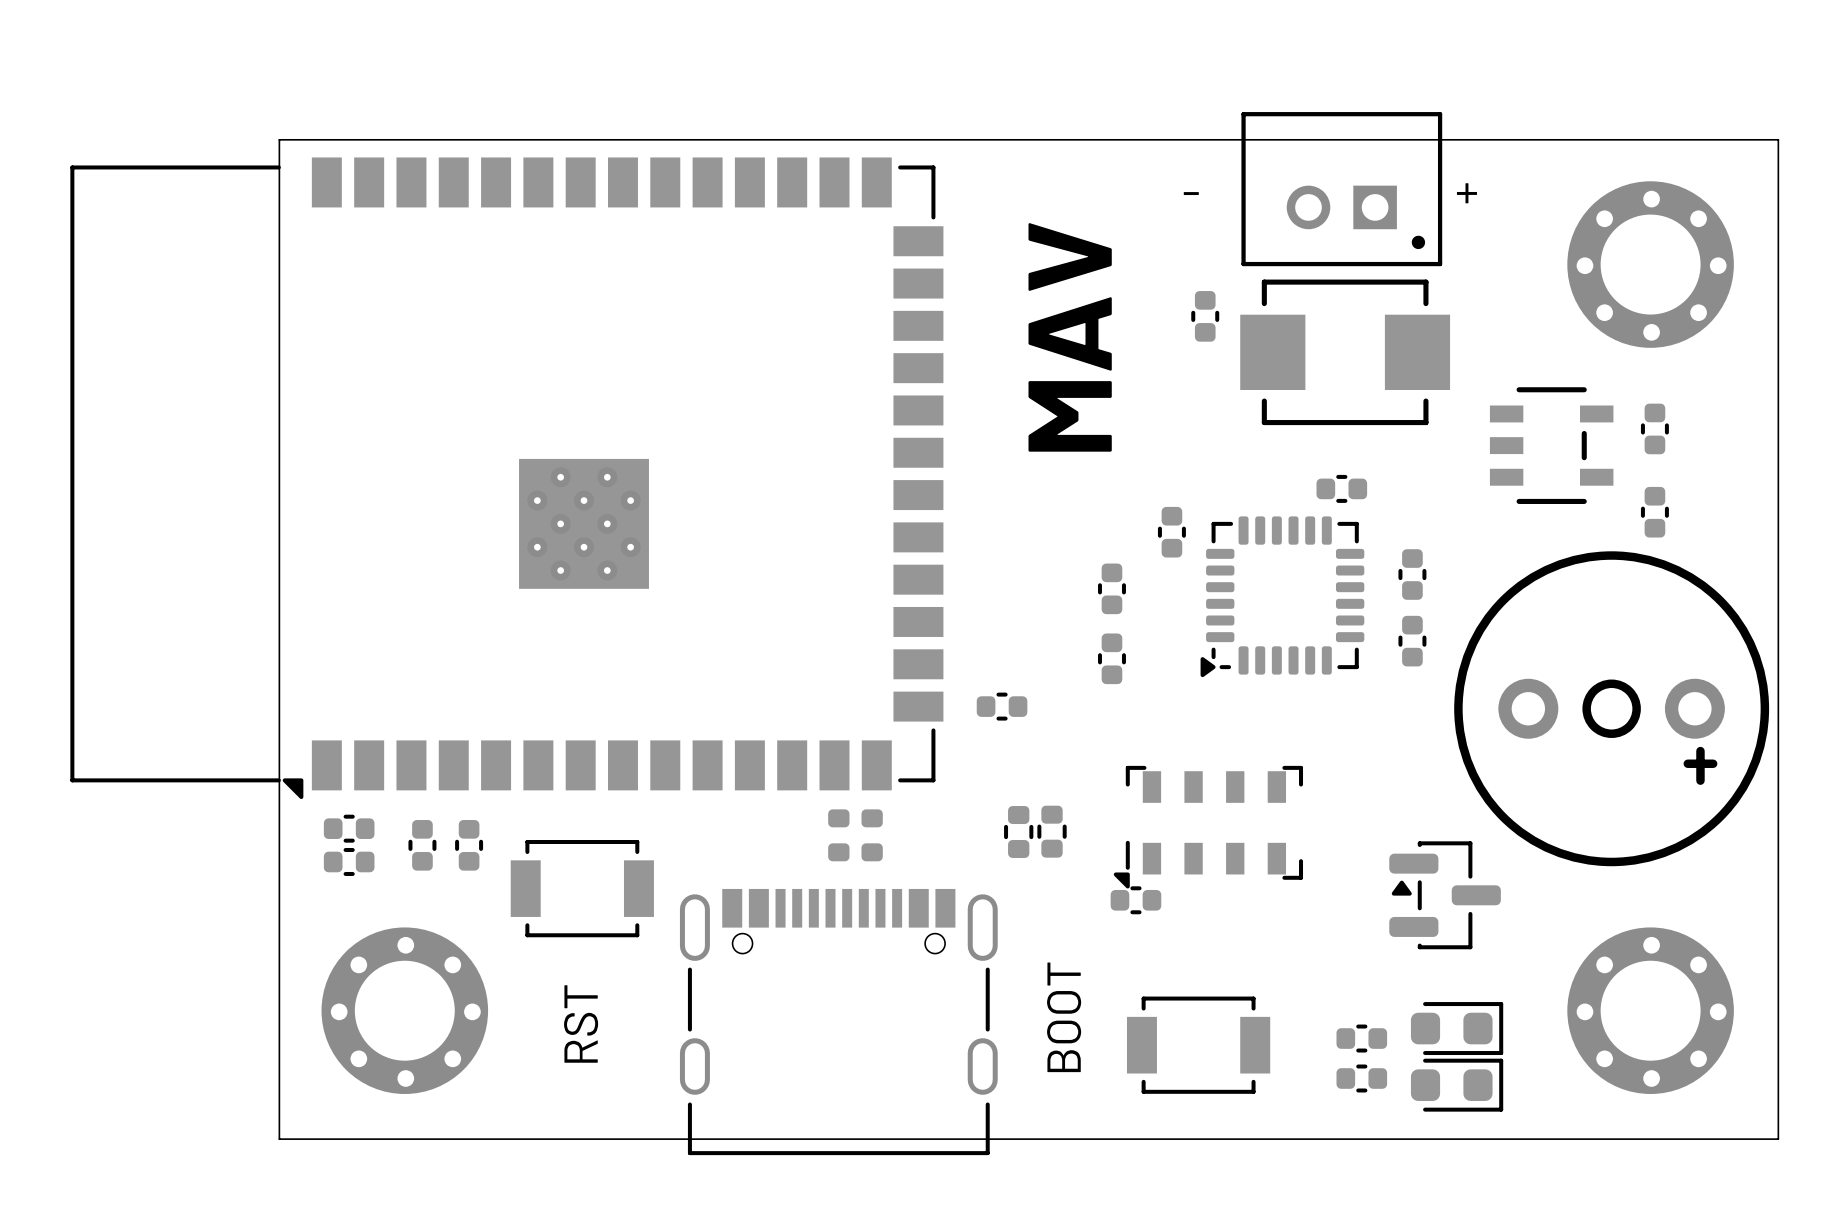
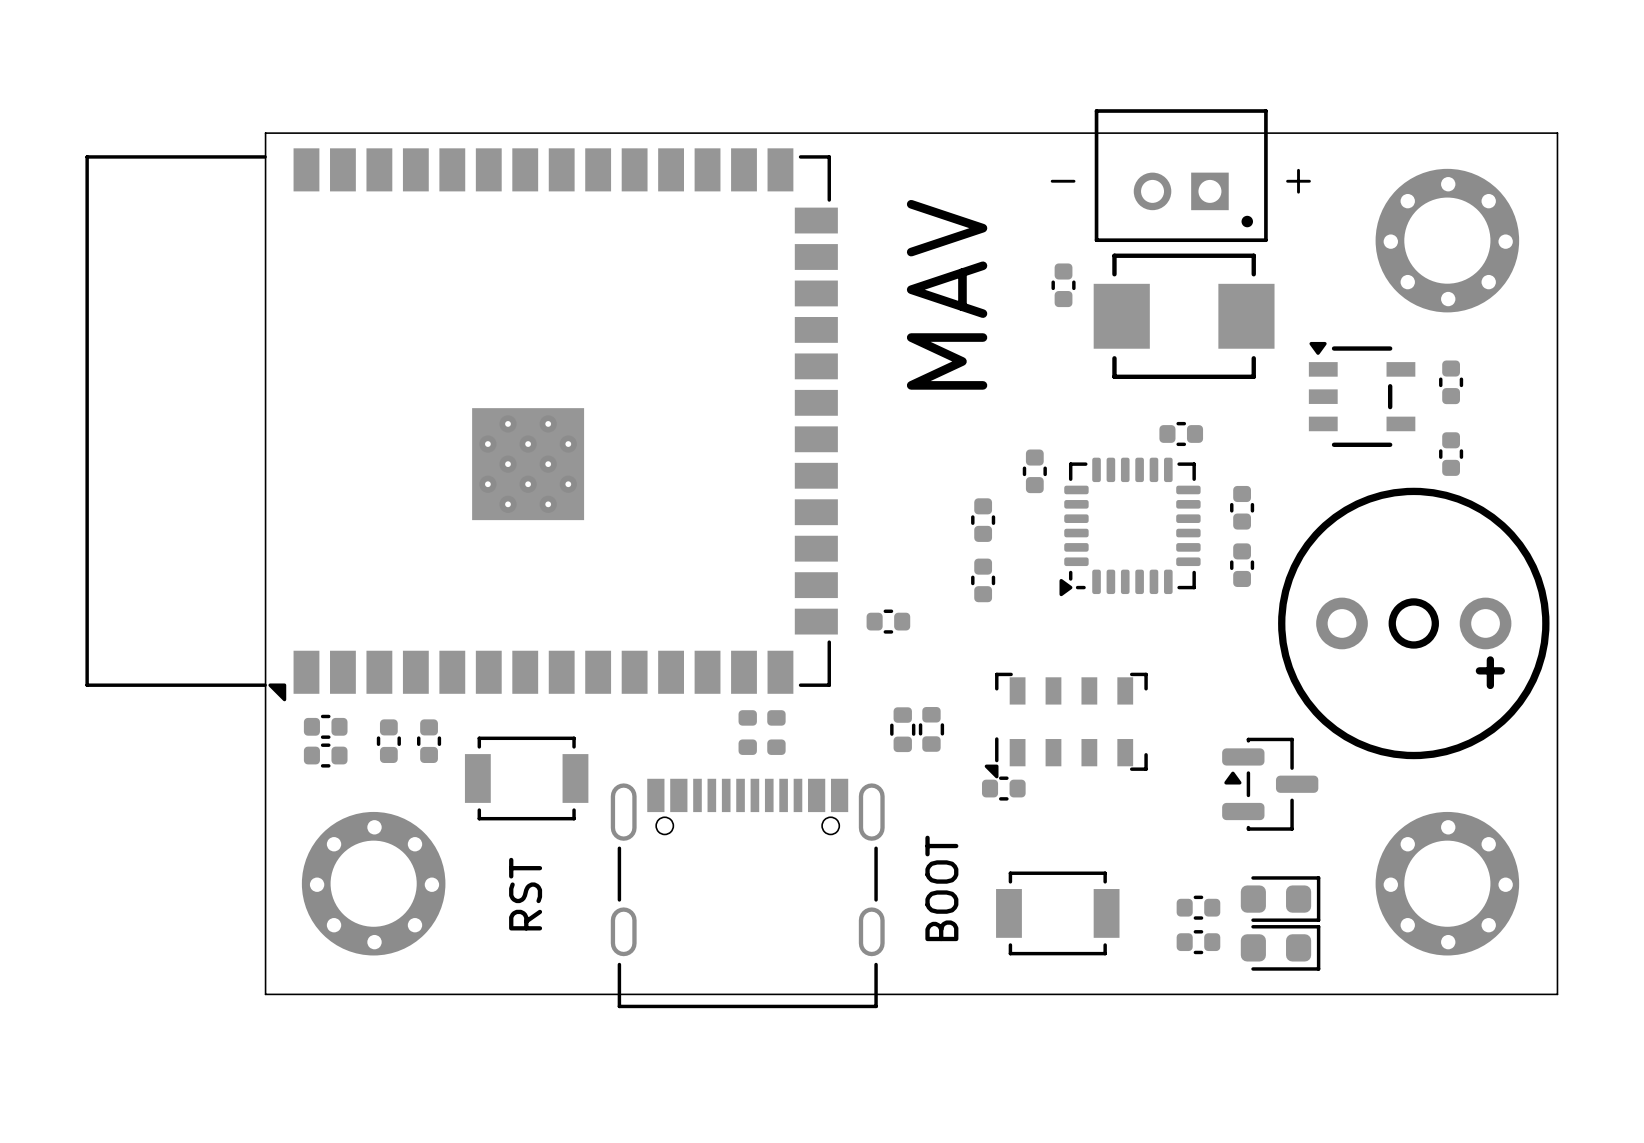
drawing: none -> [1309, 341, 1327, 355]

